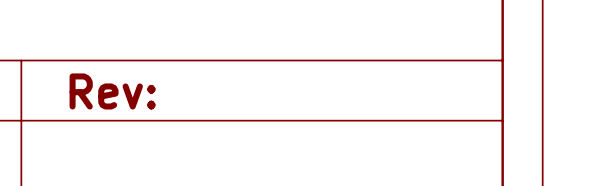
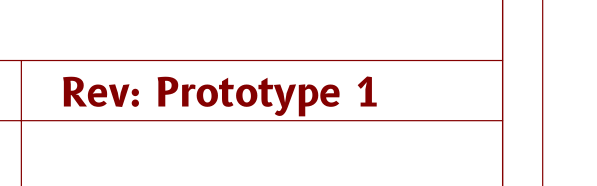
title block: Rev: (112, 91) -> Rev: Prototype 1 (219, 96)

